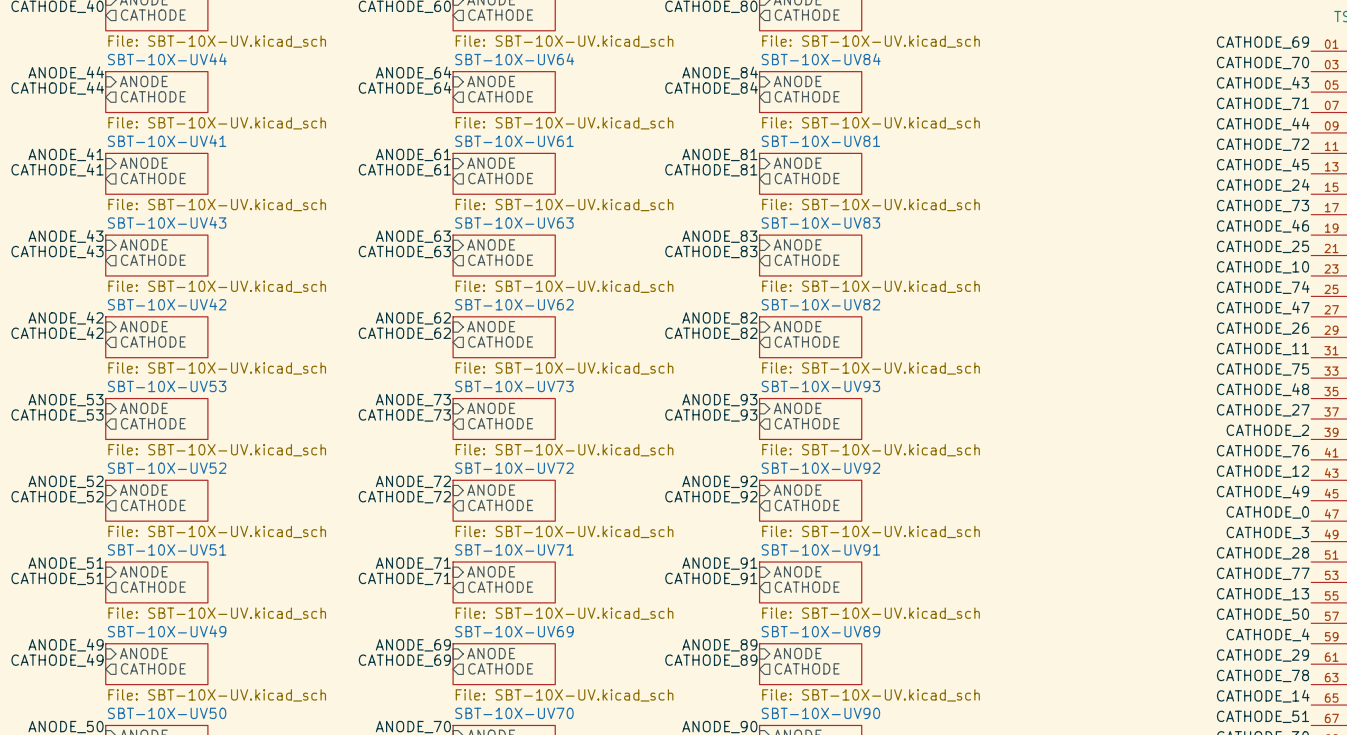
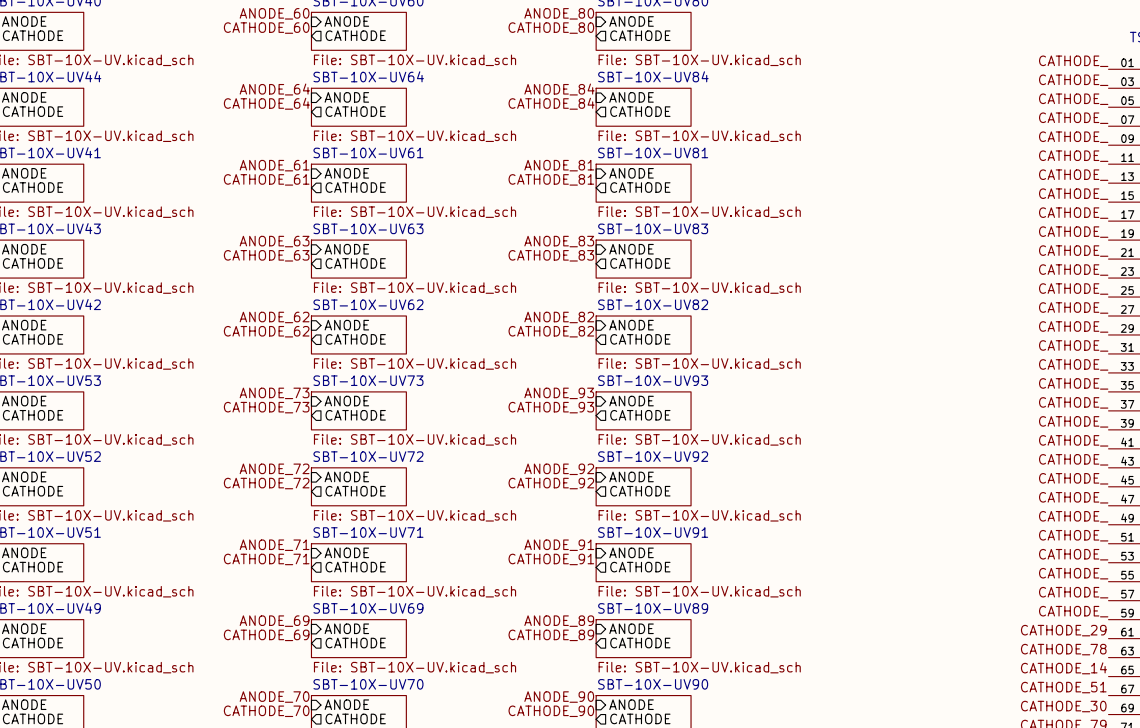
label: CATHODE_69 (1262, 42) -> CATHODE_ (1073, 61)
label: CATHODE_70 (1262, 63) -> CATHODE_ (1073, 80)
label: CATHODE_43 (1262, 83) -> CATHODE_ (1073, 99)
label: CATHODE_71 (1262, 103) -> CATHODE_ (1073, 118)
label: CATHODE_44 (1263, 124) -> CATHODE_ (1073, 137)
label: CATHODE_72 (1262, 144) -> CATHODE_ (1073, 156)
label: CATHODE_45 (1262, 164) -> CATHODE_ (1073, 175)
label: CATHODE_24 (1263, 185) -> CATHODE_ (1073, 194)
label: CATHODE_73 (1262, 206) -> CATHODE_ (1073, 213)
label: CATHODE_46 (1262, 226) -> CATHODE_ (1073, 232)
label: CATHODE_25 (1262, 246) -> CATHODE_ (1073, 251)
label: CATHODE_10 (1262, 267) -> CATHODE_ (1073, 270)
label: CATHODE_74 (1263, 287) -> CATHODE_ (1073, 289)
label: CATHODE_47 (1263, 307) -> CATHODE_ (1073, 307)
label: CATHODE_26 (1262, 328) -> CATHODE_ (1073, 326)
label: CATHODE_11 (1262, 349) -> CATHODE_ (1073, 345)
label: CATHODE_75 (1262, 369) -> CATHODE_ (1073, 364)
label: CATHODE_48 (1262, 389) -> CATHODE_ (1073, 383)
label: CATHODE_27 (1263, 410) -> CATHODE_ (1073, 402)
label: CATHODE_2 (1267, 430) -> CATHODE_ (1073, 421)
label: CATHODE_76 (1262, 451) -> CATHODE_ (1073, 440)
label: CATHODE_12 (1262, 471) -> CATHODE_ (1073, 459)
label: CATHODE_49 (1262, 491) -> CATHODE_ (1073, 478)
label: CATHODE_0 (1267, 512) -> CATHODE_ (1073, 497)
label: CATHODE_3 (1267, 532) -> CATHODE_ (1073, 516)
label: CATHODE_28 (1262, 553) -> CATHODE_ (1073, 535)
label: CATHODE_77 (1263, 573) -> CATHODE_ (1073, 554)
label: CATHODE_13 (1262, 594) -> CATHODE_ (1073, 573)
label: CATHODE_50 (1262, 614) -> CATHODE_ (1073, 592)
label: CATHODE_4 (1268, 634) -> CATHODE_ (1073, 611)

